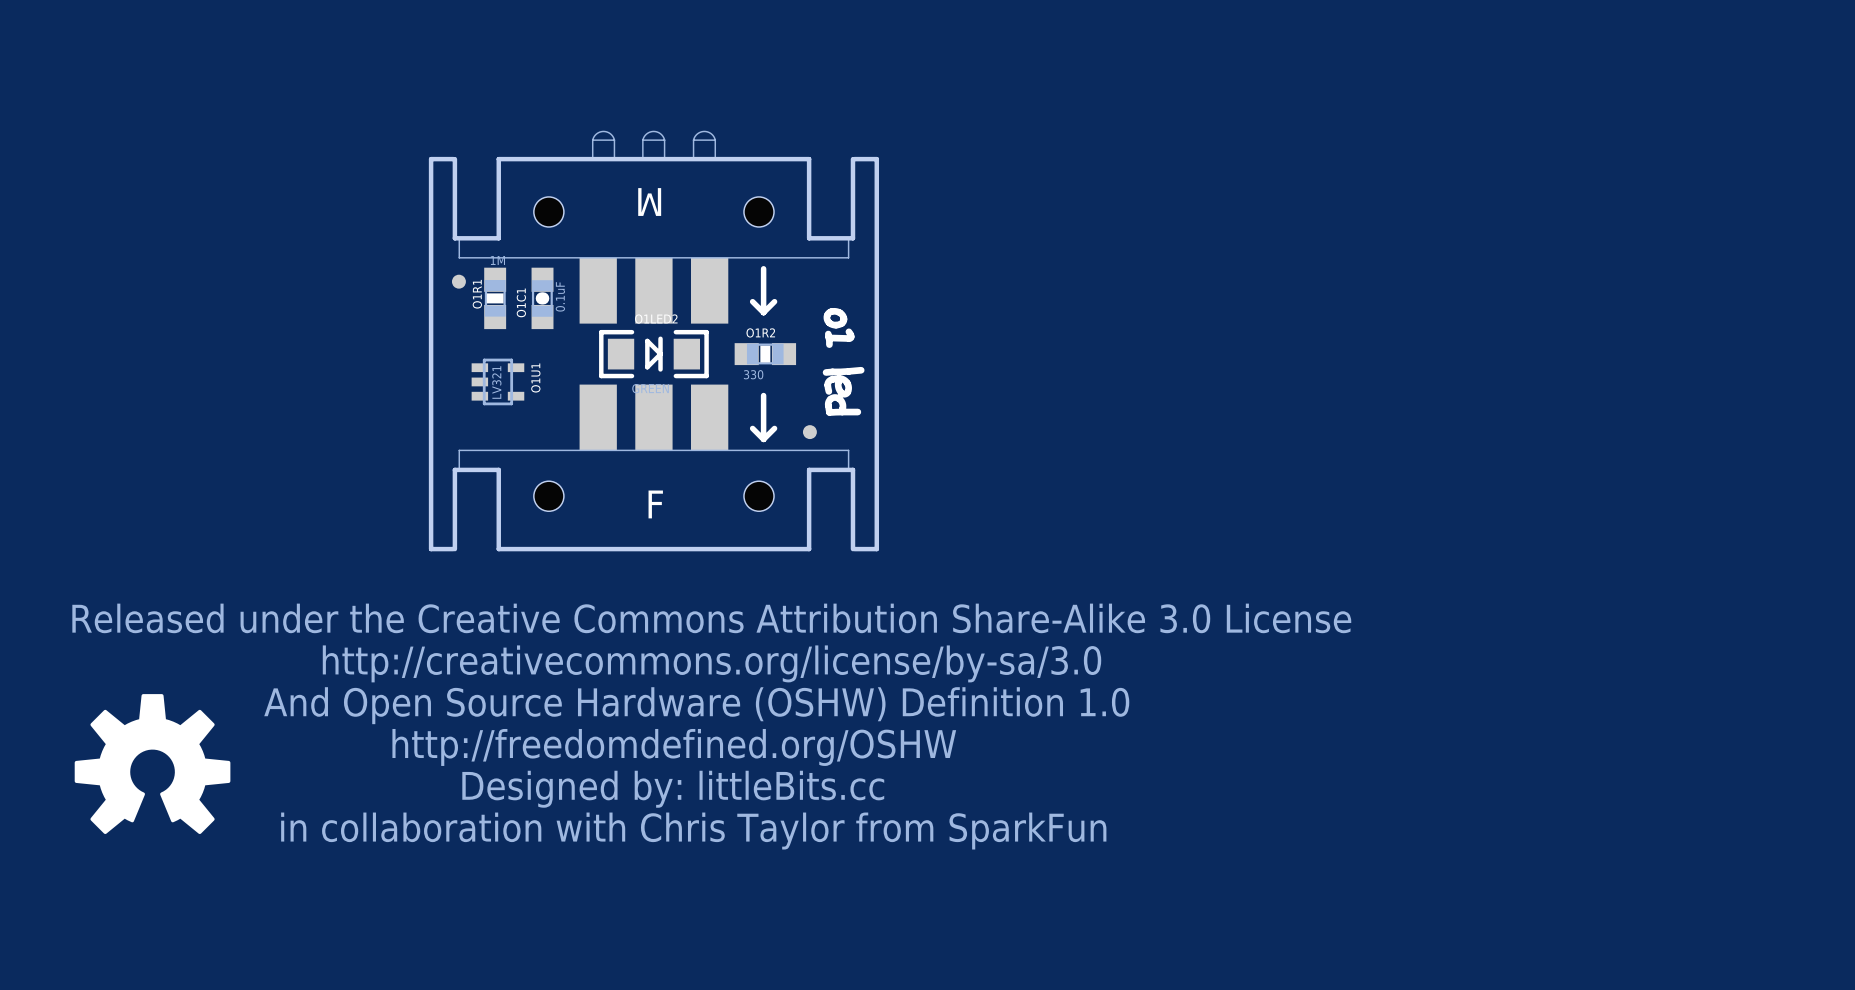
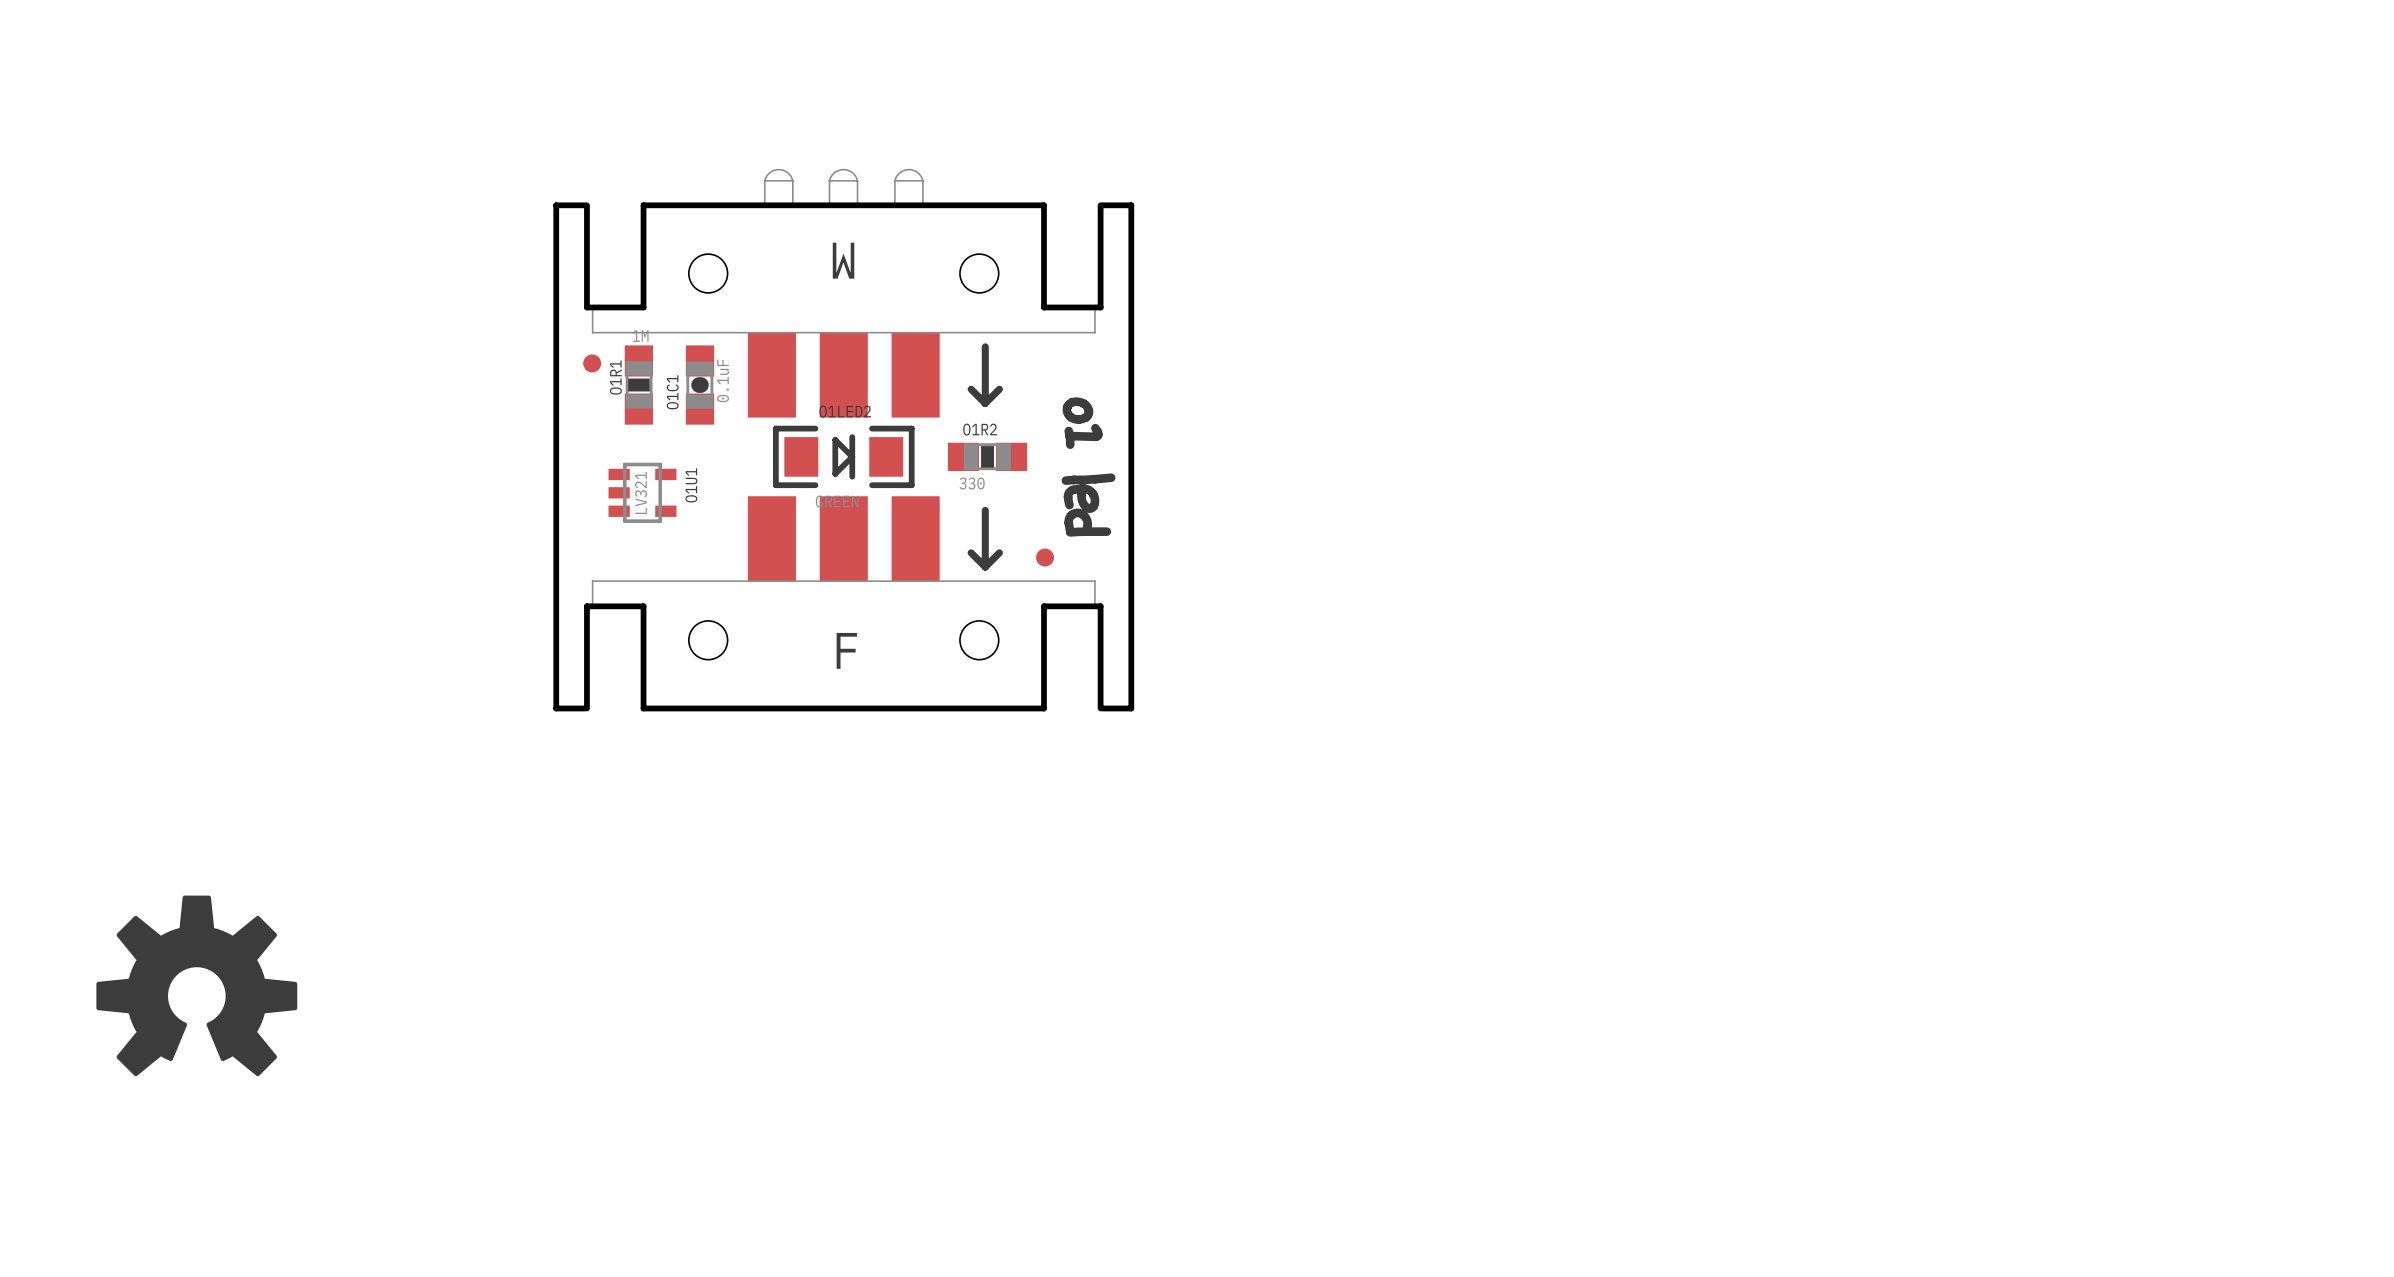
drawing: [72, 603, 1352, 850] -> none

